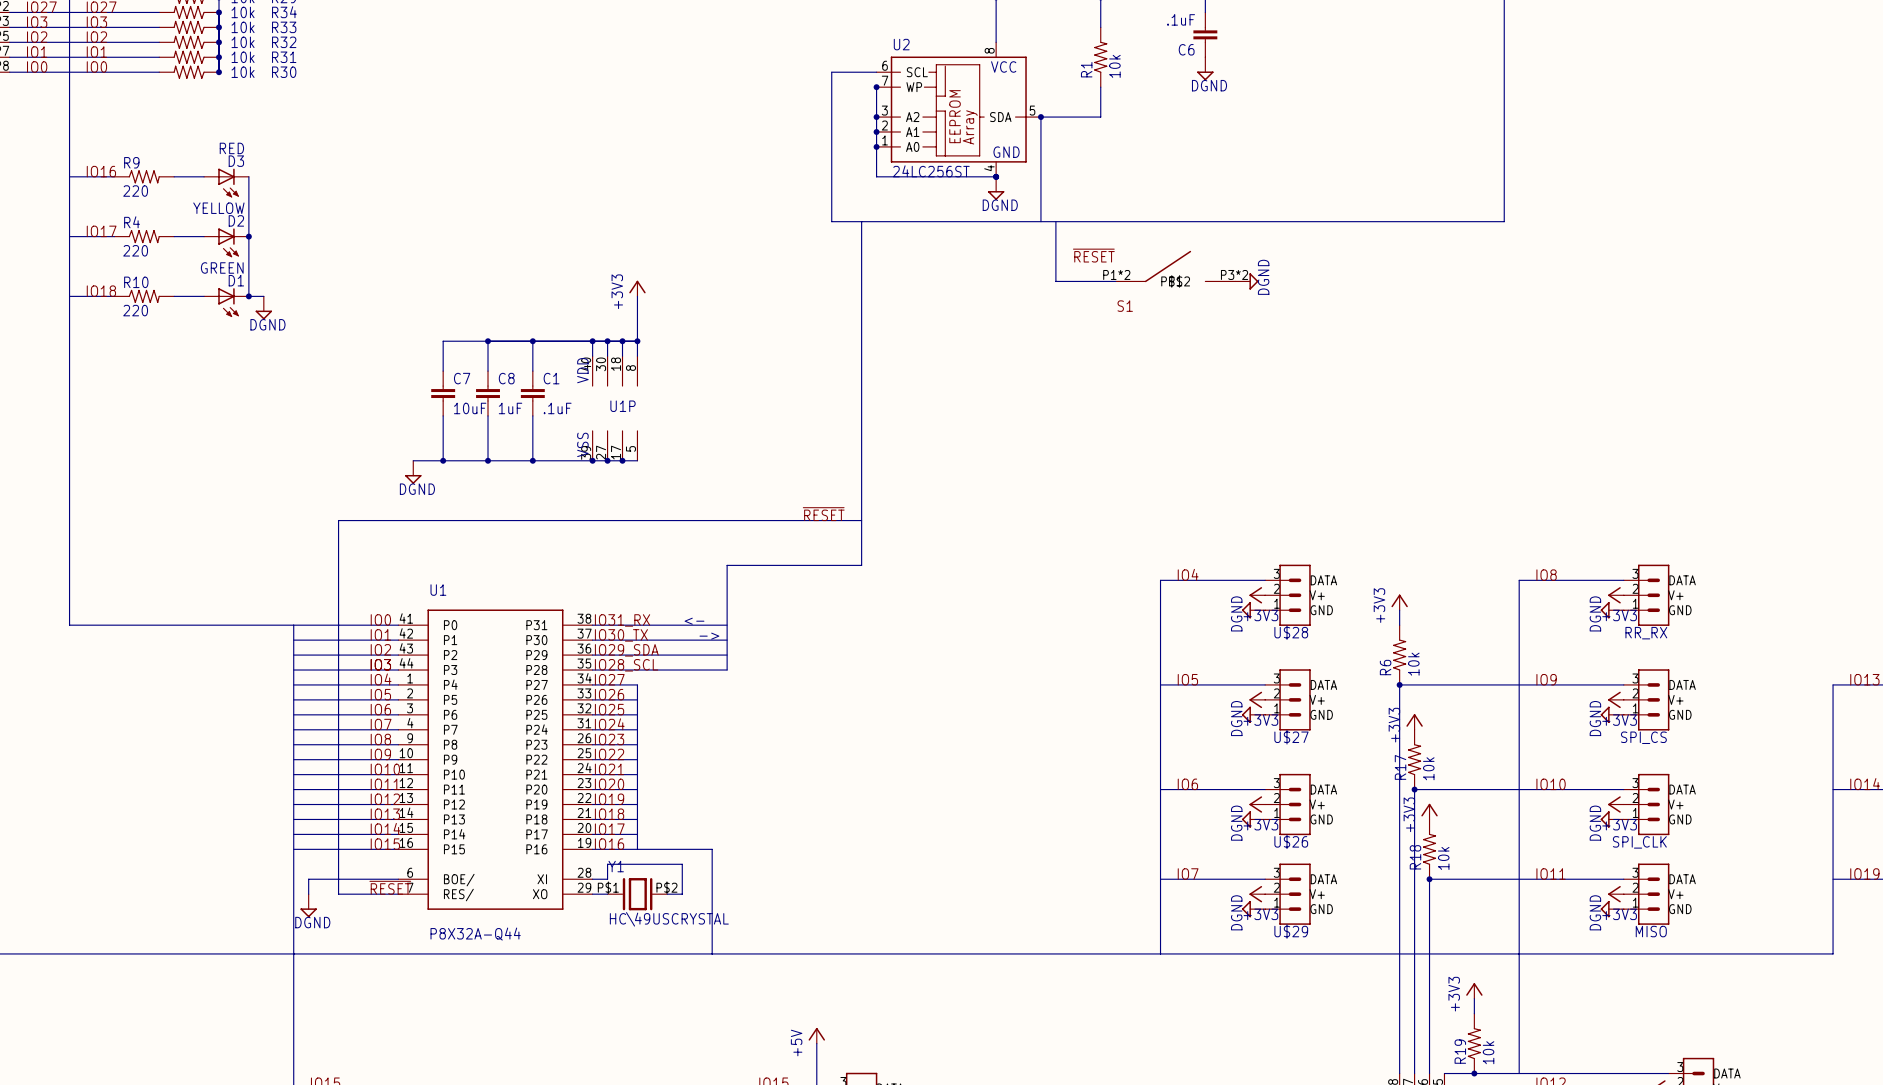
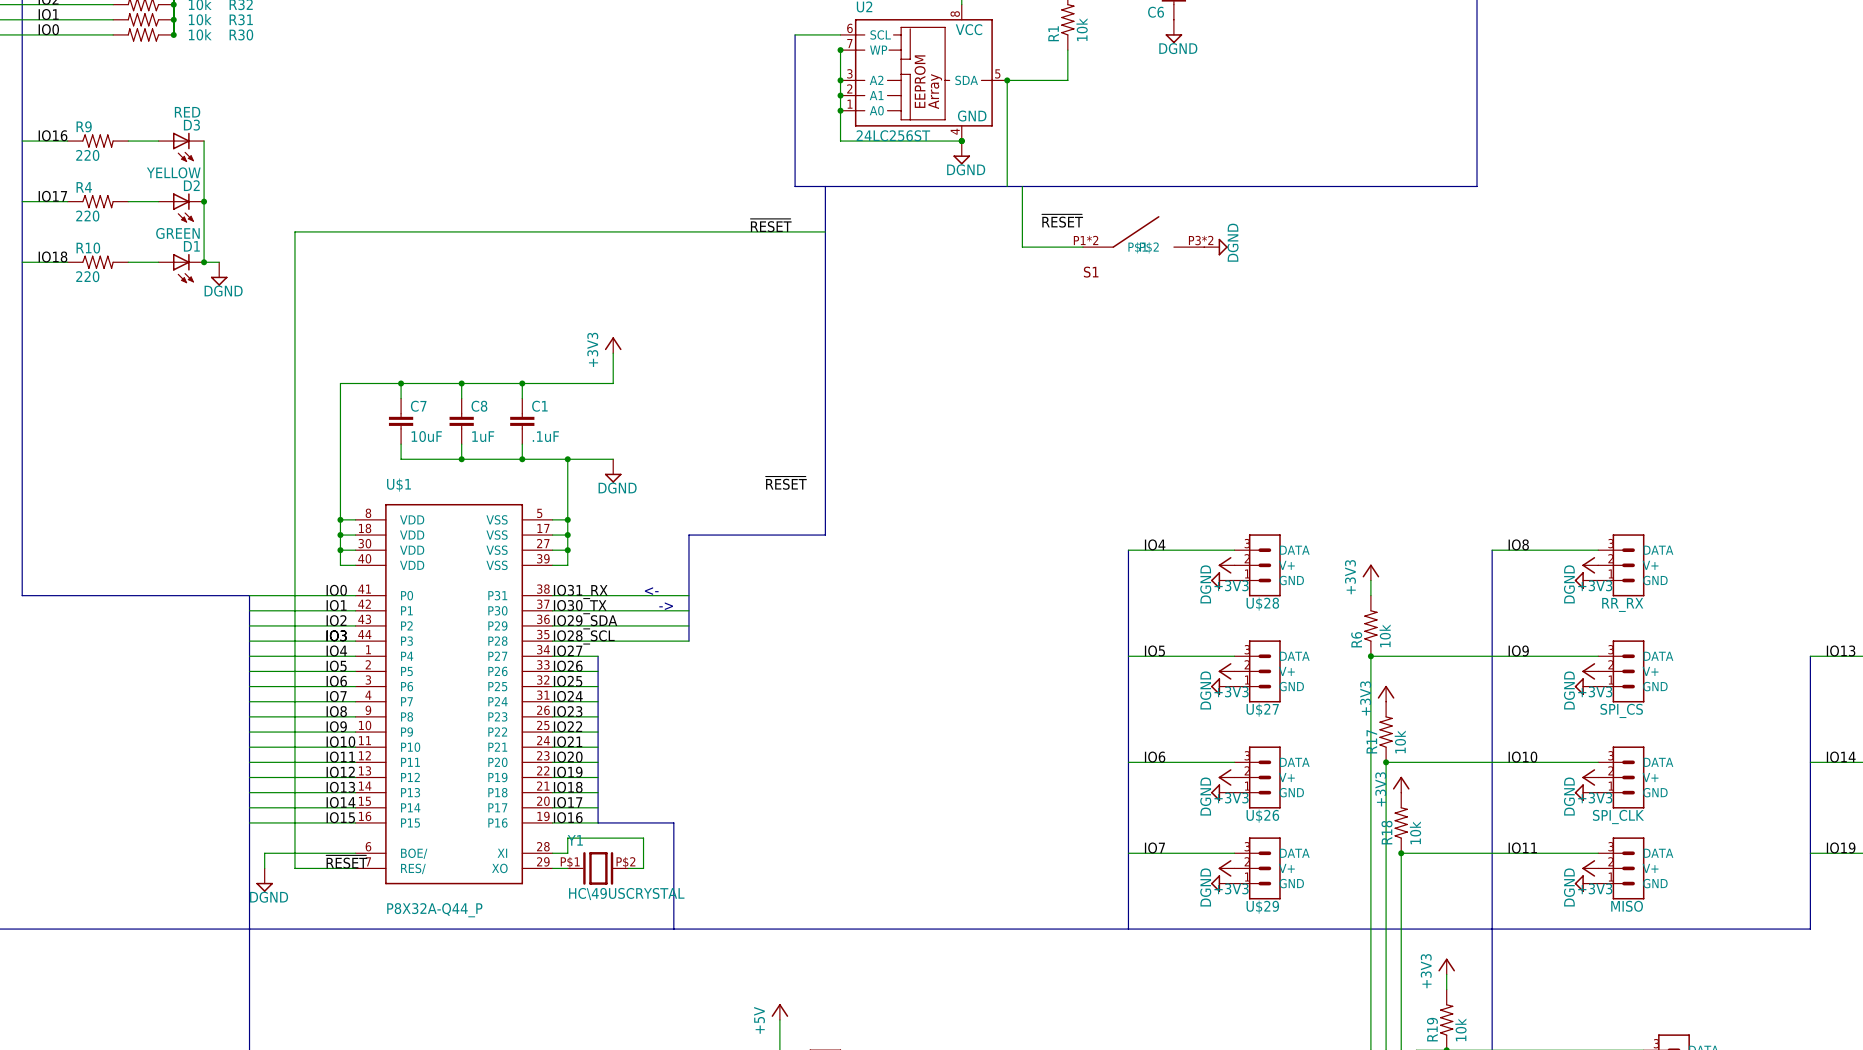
label: none -> ~{RESET} (771, 225)
power symbol position: +3V3 (637, 288) -> +3V3 (613, 345)
wire: (637, 296) (637, 356) -> none
wire: (488, 341) (488, 371) -> none
junction: (488, 341) -> none
wire: (532, 341) (532, 371) -> none
junction: (532, 341) -> none
wire: (592, 341) (592, 356) -> (522, 383) (522, 398)
junction: (592, 341) -> none
wire: (607, 341) (607, 356) -> (461, 383) (461, 398)
junction: (607, 341) -> none
wire: (622, 341) (622, 356) -> none
junction: (622, 341) -> none
wire: (637, 341) (443, 341) (443, 371) -> none
junction: (637, 341) -> none
wire: none -> (613, 353) (613, 383) (340, 383) (340, 565) (355, 565)
C7 position: (443, 393) -> (401, 421)
C8 position: (488, 393) -> (461, 421)
C1 position: (532, 393) -> (522, 421)
U1P: (615, 408) -> none
junction: none -> (401, 383)
wire: (488, 415) (488, 460) -> none
junction: none -> (461, 383)
wire: (532, 415) (532, 460) -> none
junction: none -> (522, 383)
wire: (413, 460) (637, 460) -> none
junction: (443, 460) -> none
junction: (488, 460) -> none
junction: (532, 460) -> none
junction: (592, 460) -> none
junction: (607, 460) -> none
junction: (622, 460) -> none
power symbol: DGND (413, 472) -> none
wire: none -> (401, 444) (401, 459) (613, 459)
wire: none -> (461, 444) (461, 459)
wire: none -> (522, 444) (522, 459)
junction: none -> (461, 459)
junction: none -> (522, 459)
wire: none -> (567, 459) (567, 565) (552, 565)
junction: none -> (567, 459)
power symbol: none -> DGND (613, 471)
wire: (338, 520) (861, 520) -> (294, 489) (294, 231) (825, 231)
wire: none -> (340, 519) (355, 519)
junction: none -> (340, 519)
wire: none -> (552, 519) (567, 519)
junction: none -> (567, 519)
wire: none -> (340, 535) (355, 535)
junction: none -> (340, 535)
wire: none -> (552, 535) (567, 535)
junction: none -> (567, 535)
wire: none -> (340, 550) (355, 550)
junction: none -> (340, 550)
wire: none -> (552, 550) (567, 550)
junction: none -> (567, 550)
U$1: none -> P8X32A-Q44_P (454, 694)
U1: P8X32A-Q44 (495, 759) -> none

